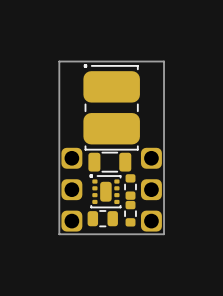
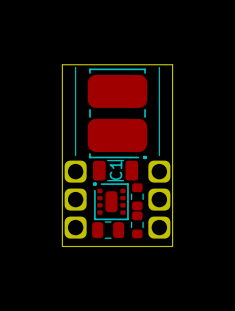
part rotation: 0° (111, 107) -> 180° (117, 113)
part: none -> (75, 152)
part: none -> (159, 152)
C1 name: none -> C1 (115, 170)
part footprint: [89, 174, 122, 209] -> [93, 182, 129, 221]
part: (71, 189) -> none
part: (151, 189) -> none

